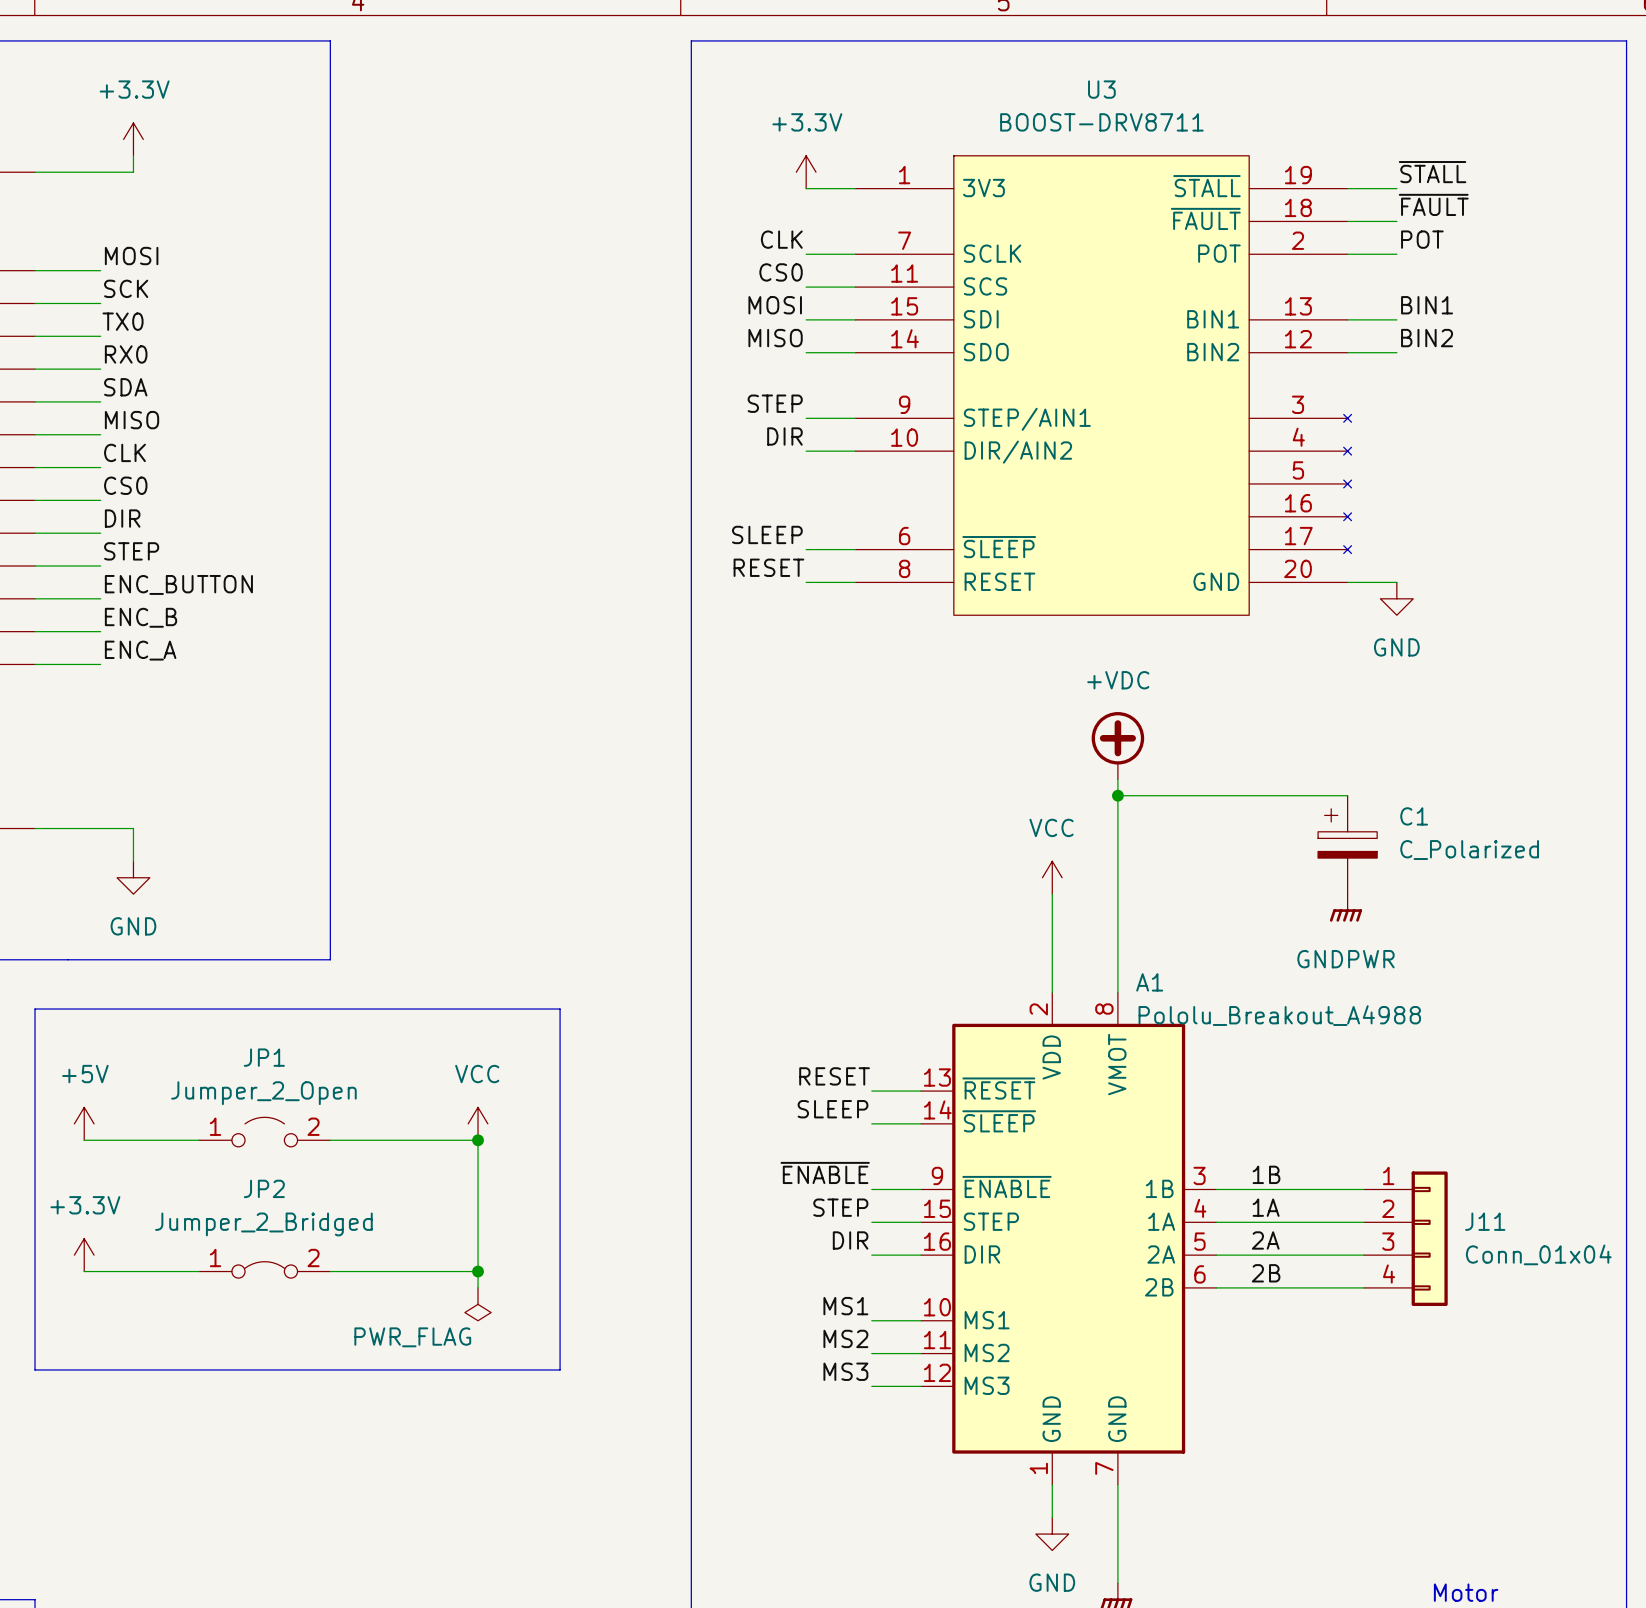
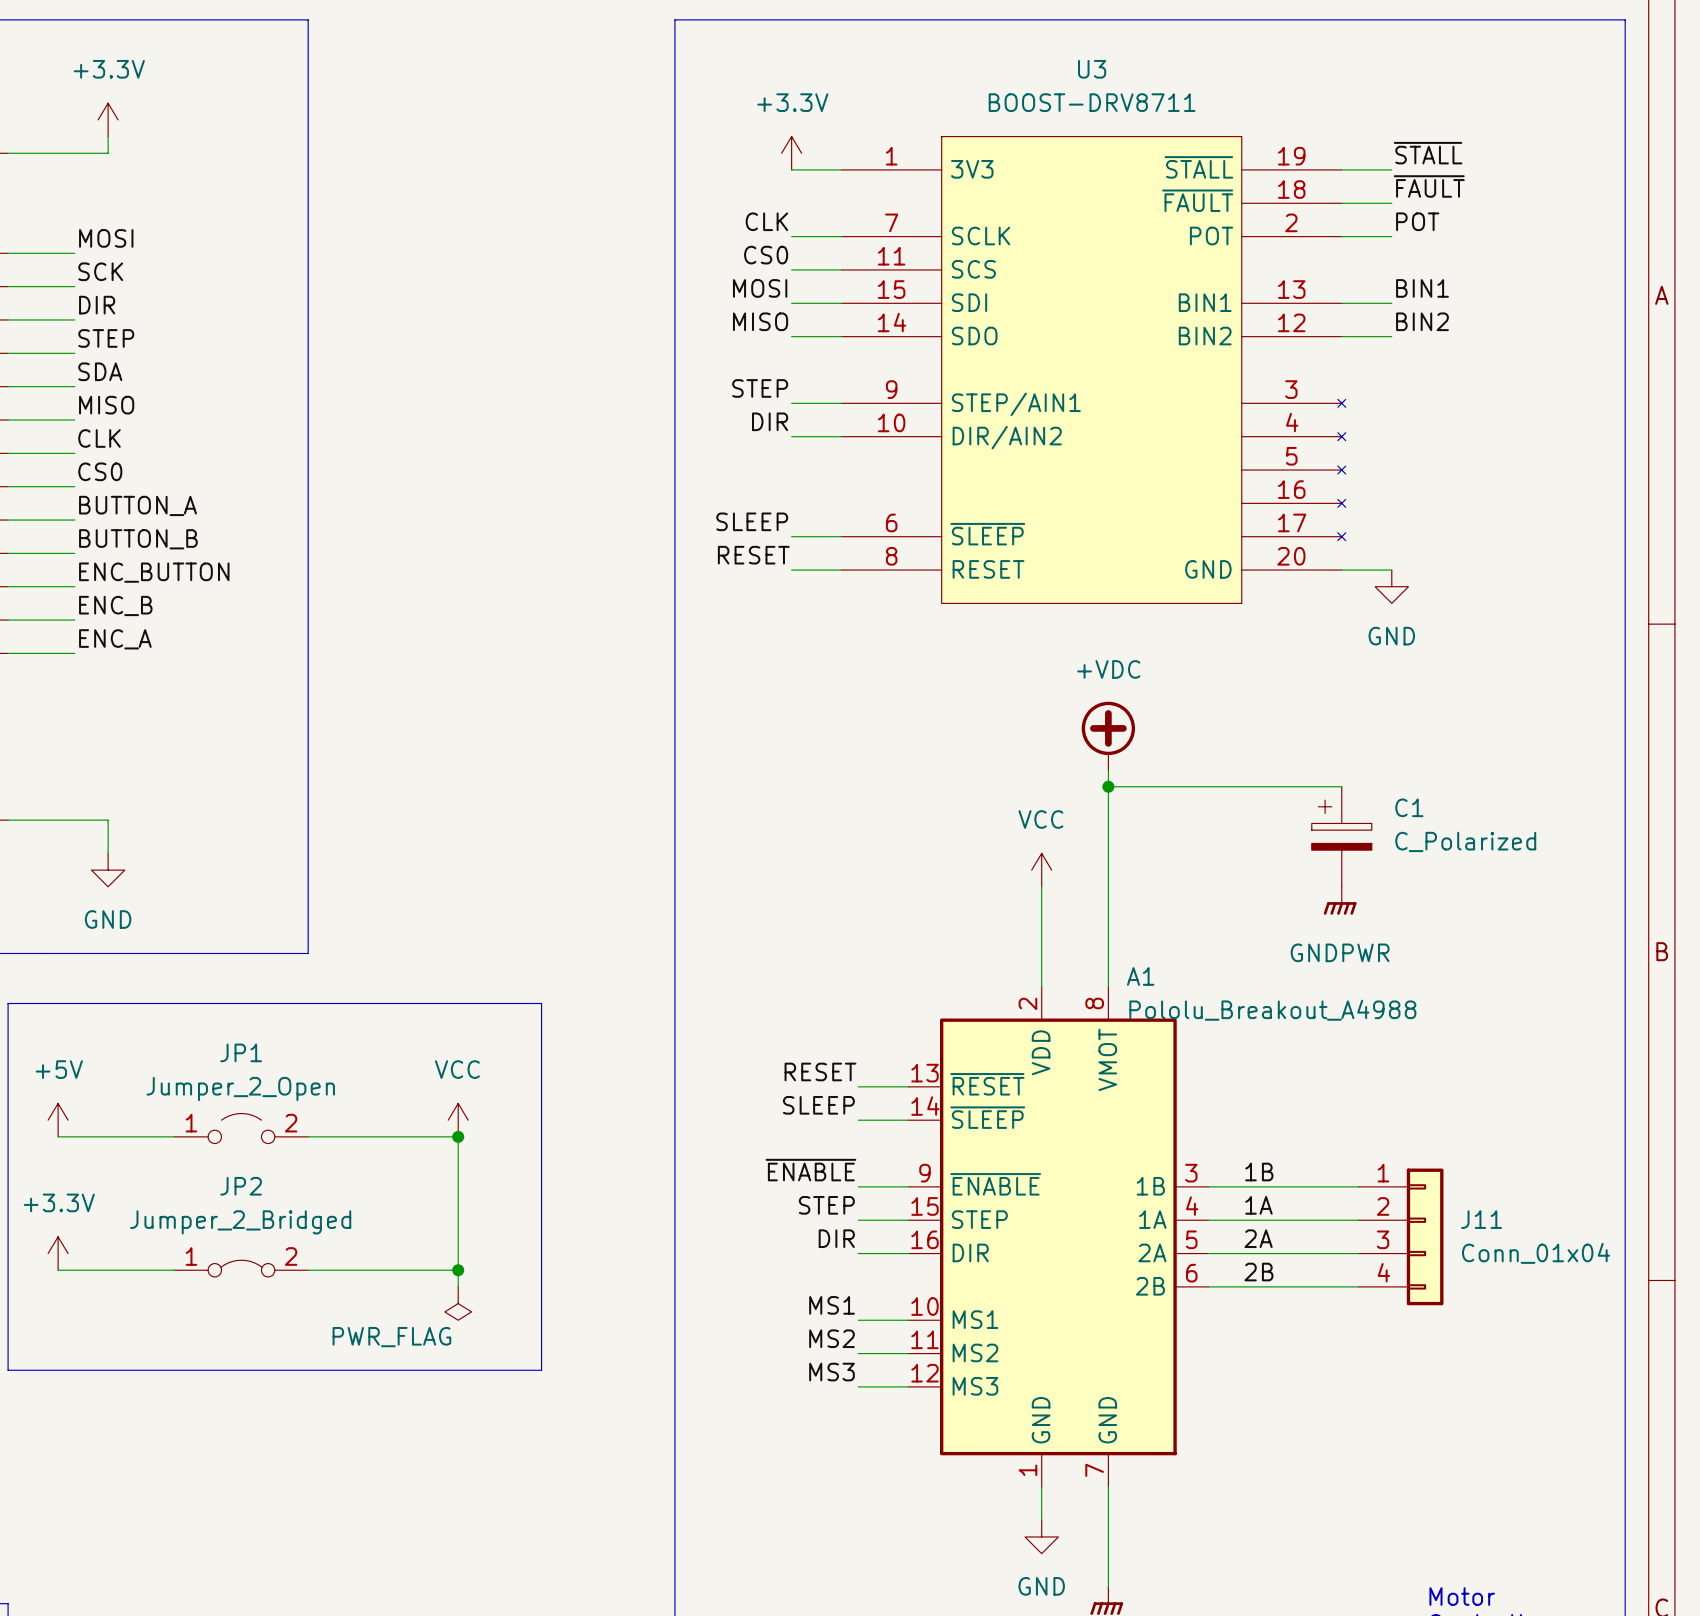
label: TX0 (123, 321) -> DIR (97, 305)
label: RX0 (126, 354) -> STEP (106, 338)
label: DIR (122, 518) -> BUTTON_A (138, 505)
label: STEP (131, 551) -> BUTTON_B (138, 539)

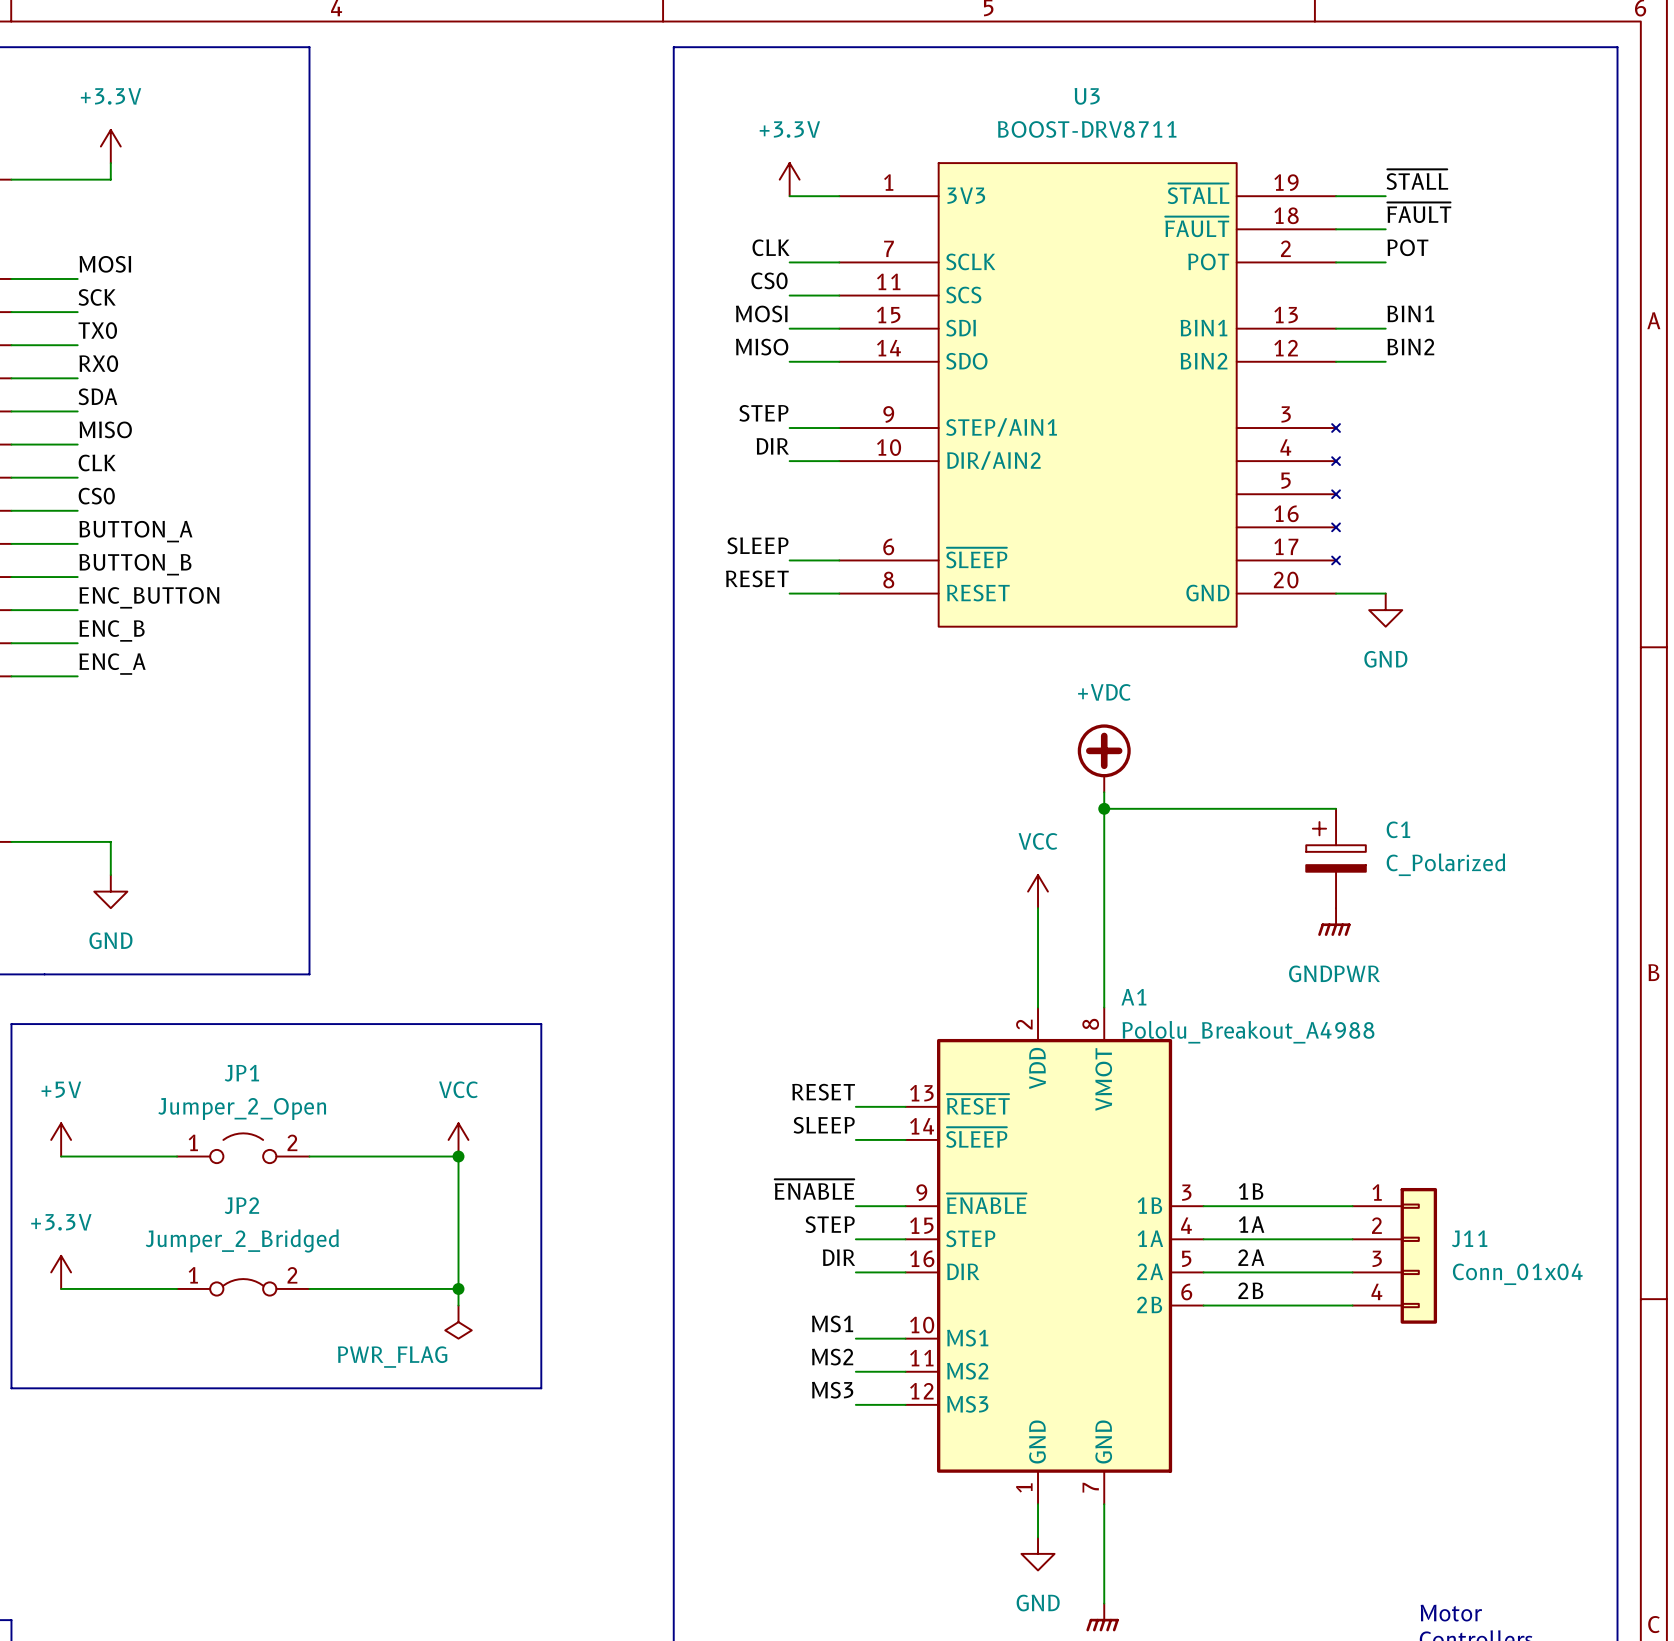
label: DIR (97, 305) -> TX0 (97, 330)
label: STEP (106, 338) -> RX0 (98, 363)

